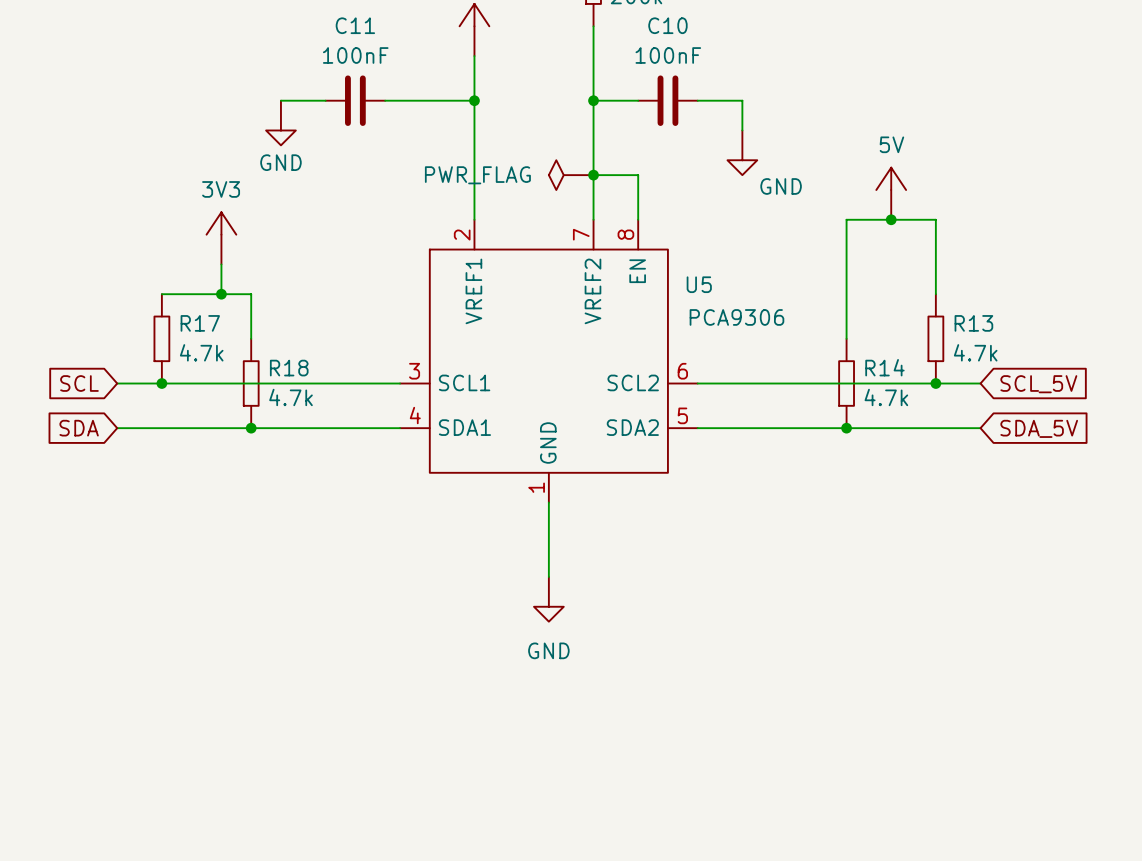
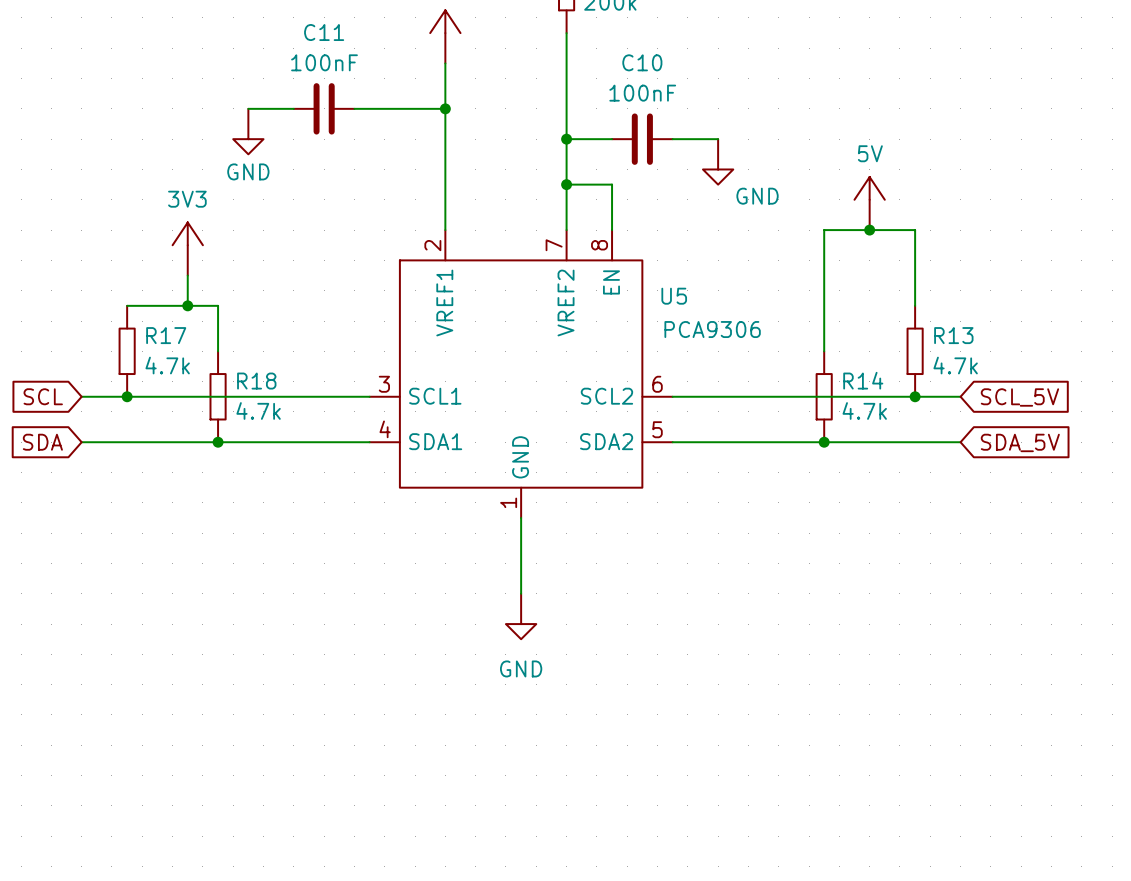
wire: (593, 100) (638, 100) -> (566, 139) (612, 139)
junction position: (593, 100) -> (566, 139)
C10 position: (667, 100) -> (642, 139)
wire: (697, 100) (742, 100) (742, 130) -> (672, 139) (718, 139)
power symbol: PWR_FLAG (571, 175) -> none

